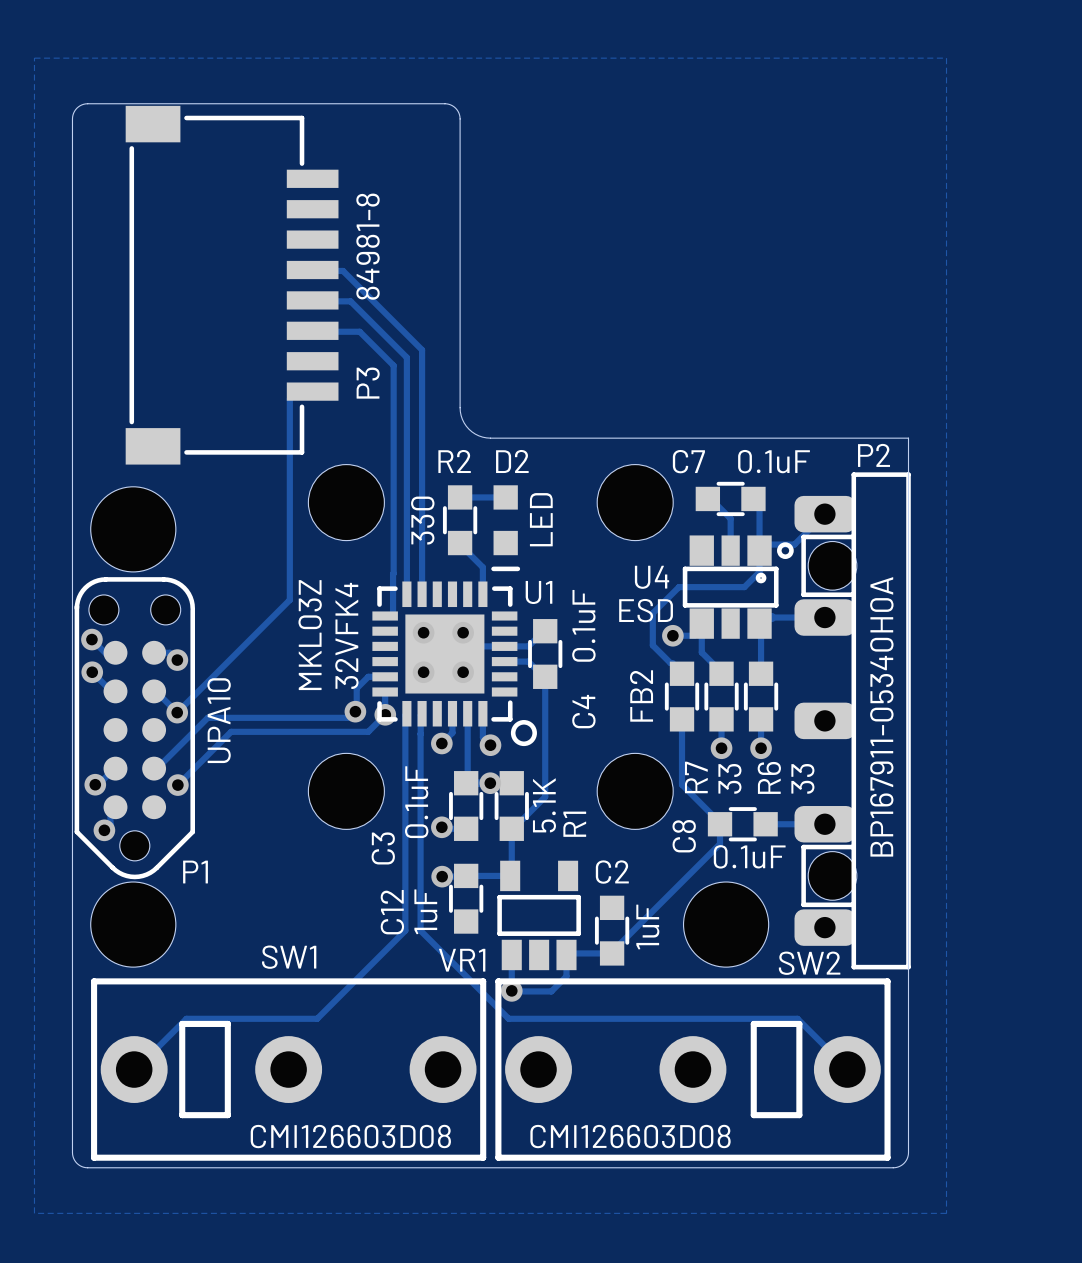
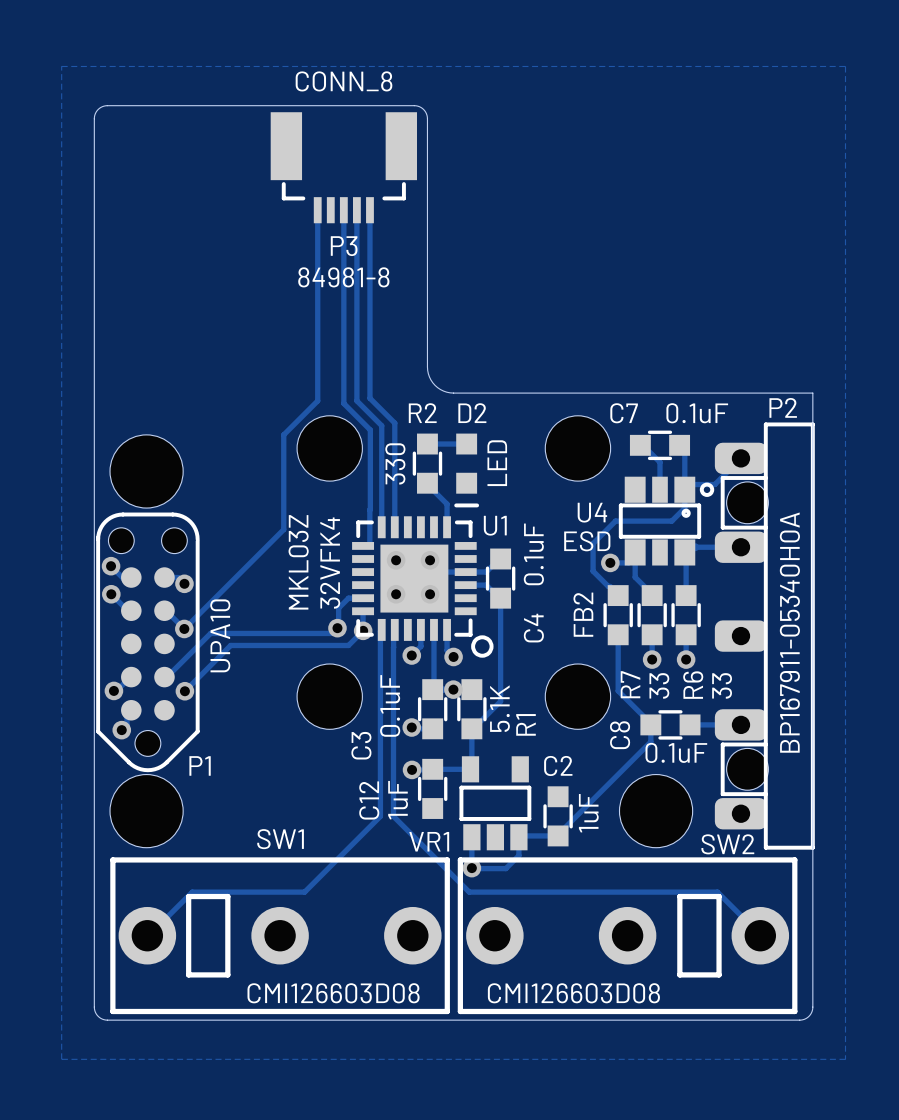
P3 value: none -> CONN_8 (344, 81)
P3 footprint: [125, 105, 339, 465] -> [270, 112, 418, 224]
text rotation: 0° (368, 246) -> 90° clockwise (343, 277)
track: (323, 270) (343, 270) (422, 349) (422, 473) -> (369, 220) (369, 398) (394, 423)
track: (329, 301) (350, 301) (406, 357) (406, 476) -> (356, 218) (356, 400) (381, 425)
track: (323, 331) (359, 331) (393, 365) (393, 481) -> (343, 220) (343, 403) (370, 430)
P3 name position: P3 (368, 383) -> P3 (344, 246)
track: (289, 398) (289, 600) -> (317, 220) (317, 400) (283, 434) (283, 529) (281, 532)

